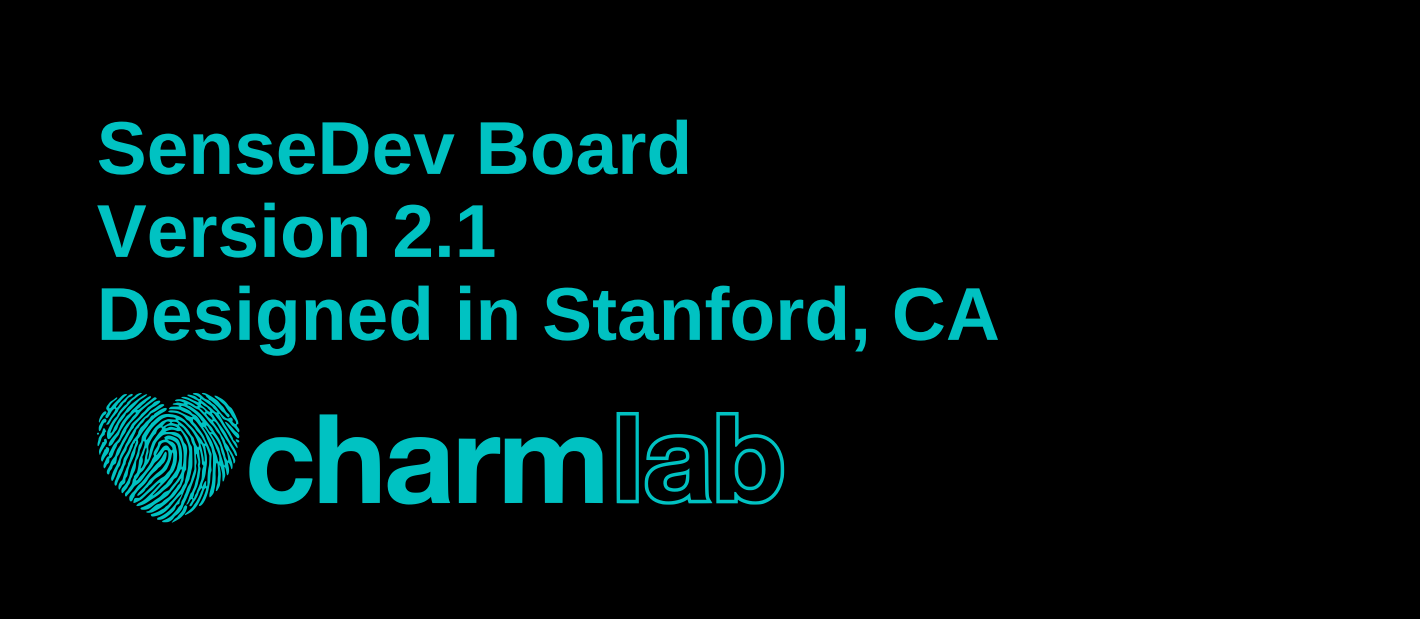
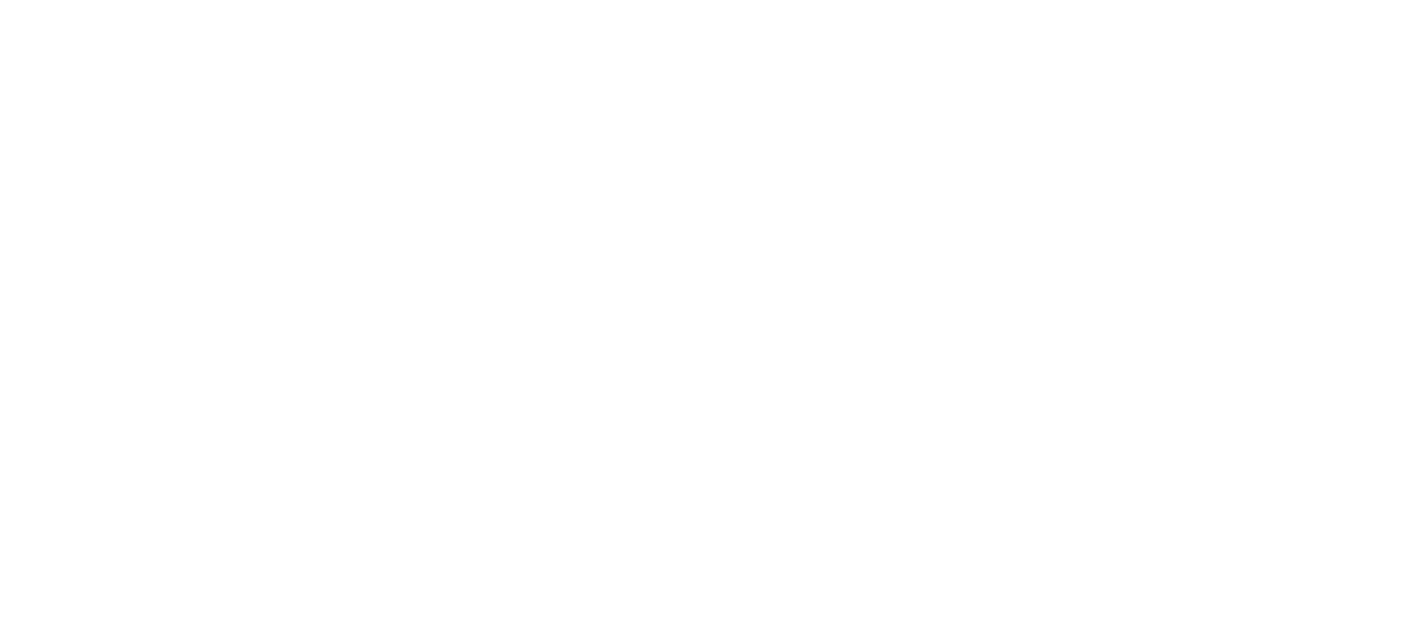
text: SenseDev Board (393, 147) -> none
text: Version 2.1 (295, 230) -> none
text: Designed in Stanford, CA (549, 320) -> none
drawing: [96, 392, 785, 523] -> none

